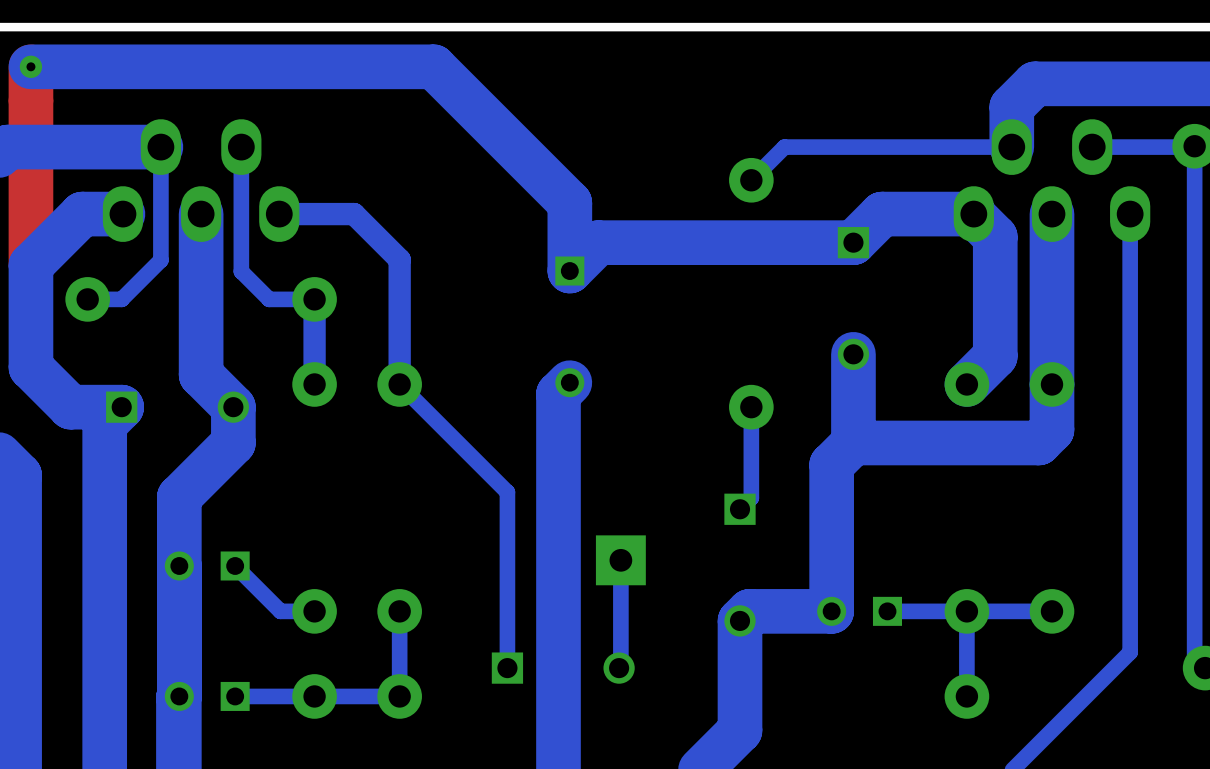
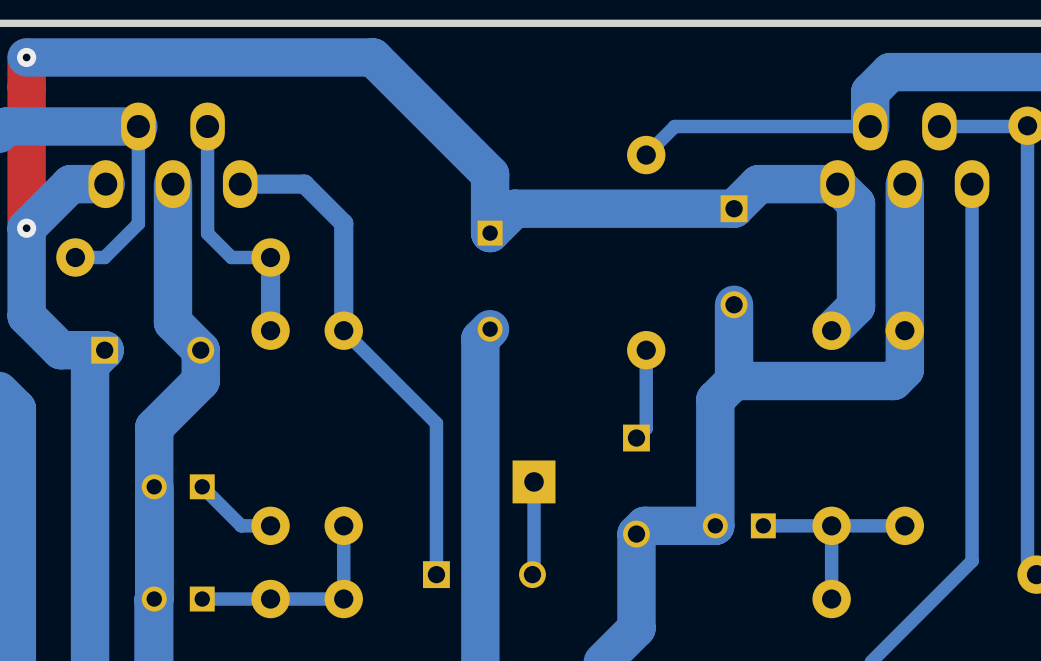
via: none -> (26, 228)

